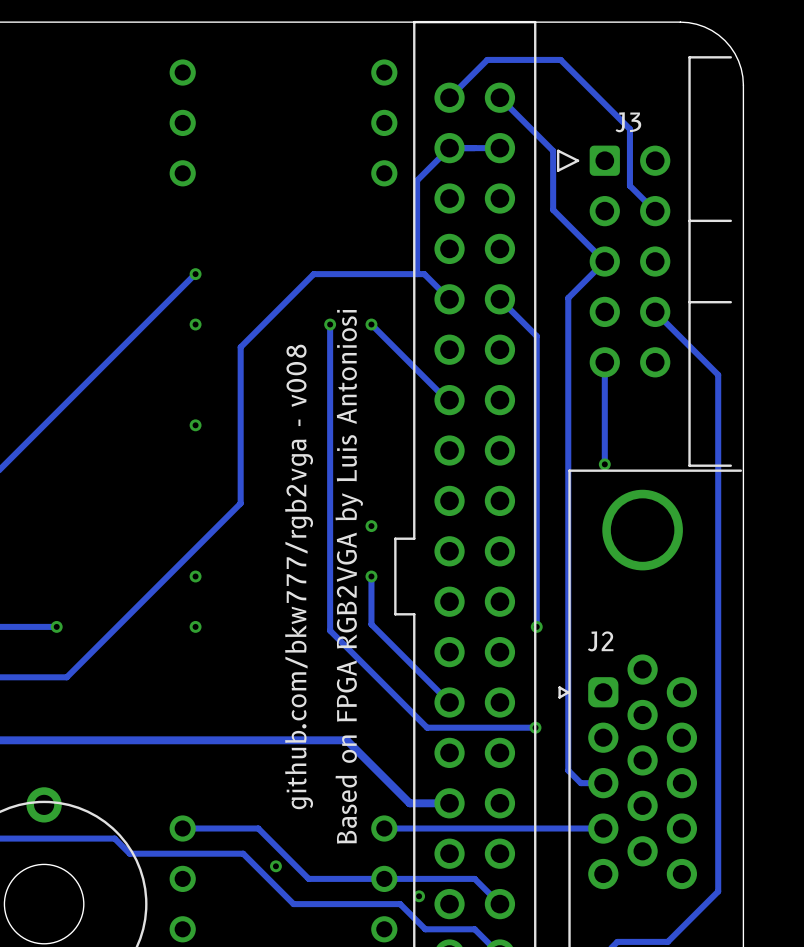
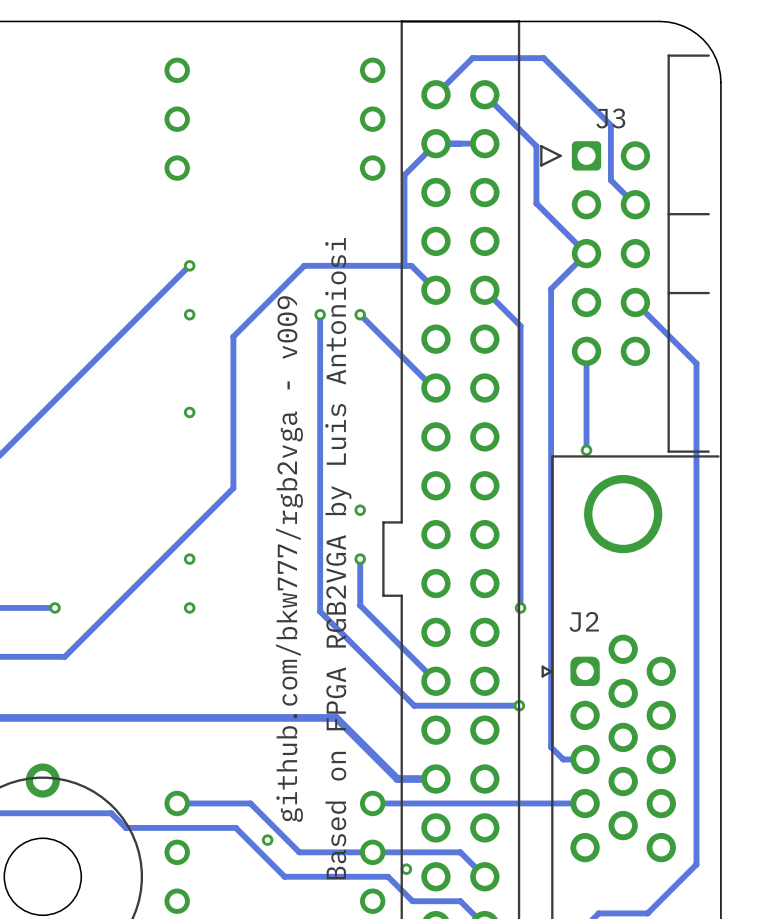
text: github.com/bkw777/rgb2vga - v008 (299, 576) -> github.com/bkw777/rgb2vga - v009 (289, 559)

